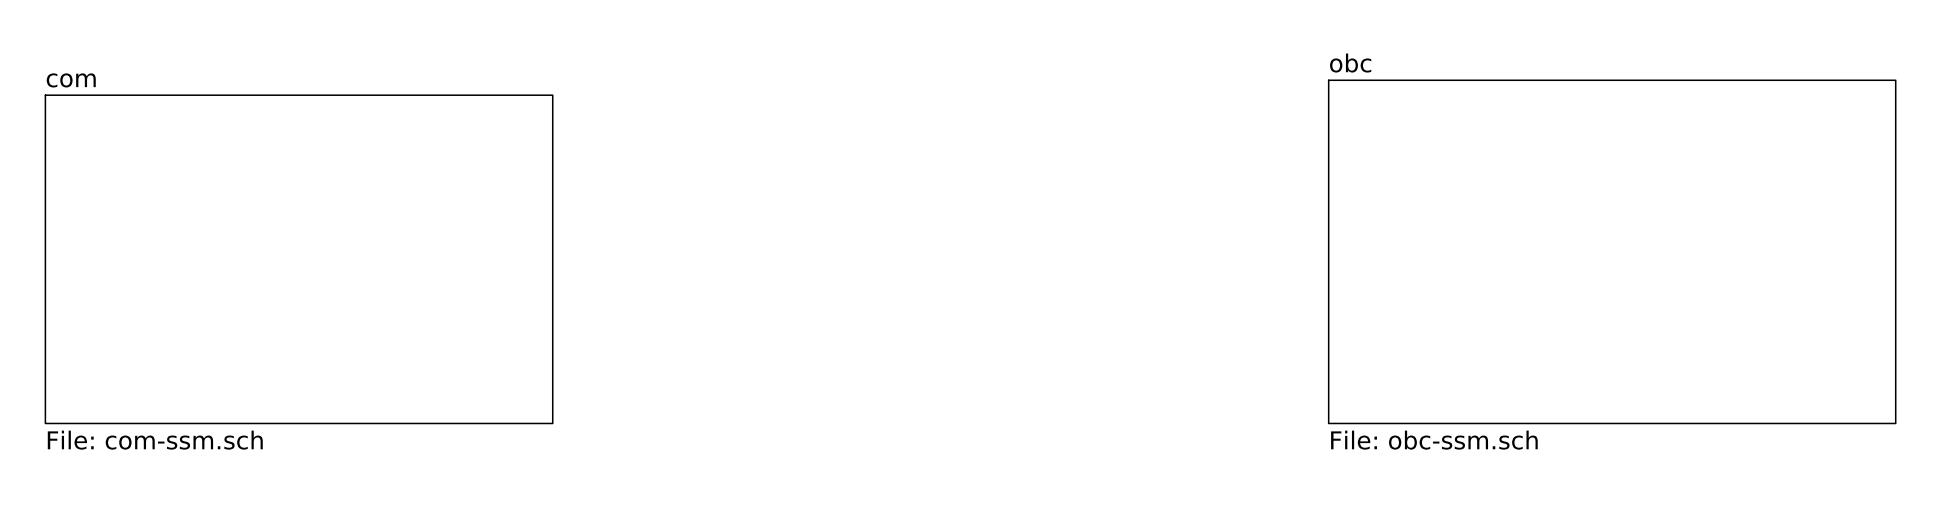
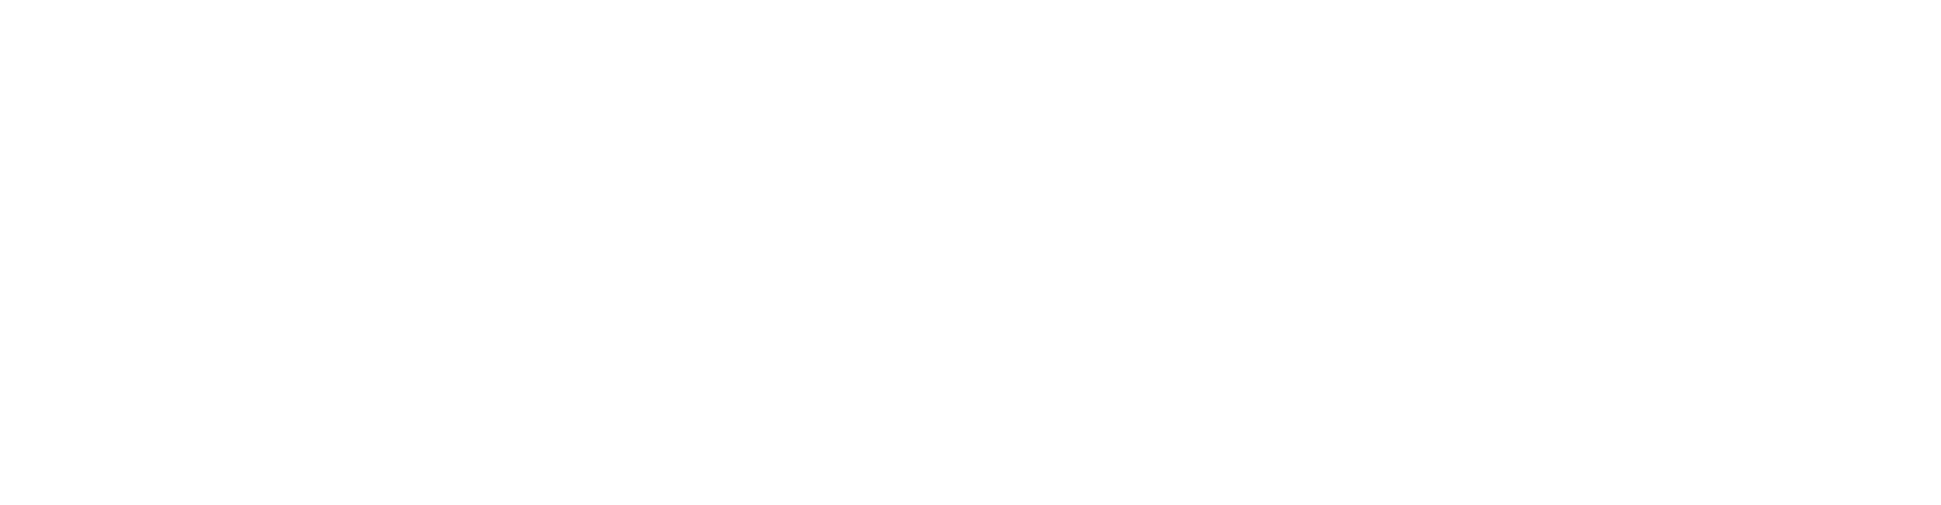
sheet obc: File: obc-ssm.sch (1612, 251) -> none
sheet com: File: com-ssm.sch (299, 259) -> none

